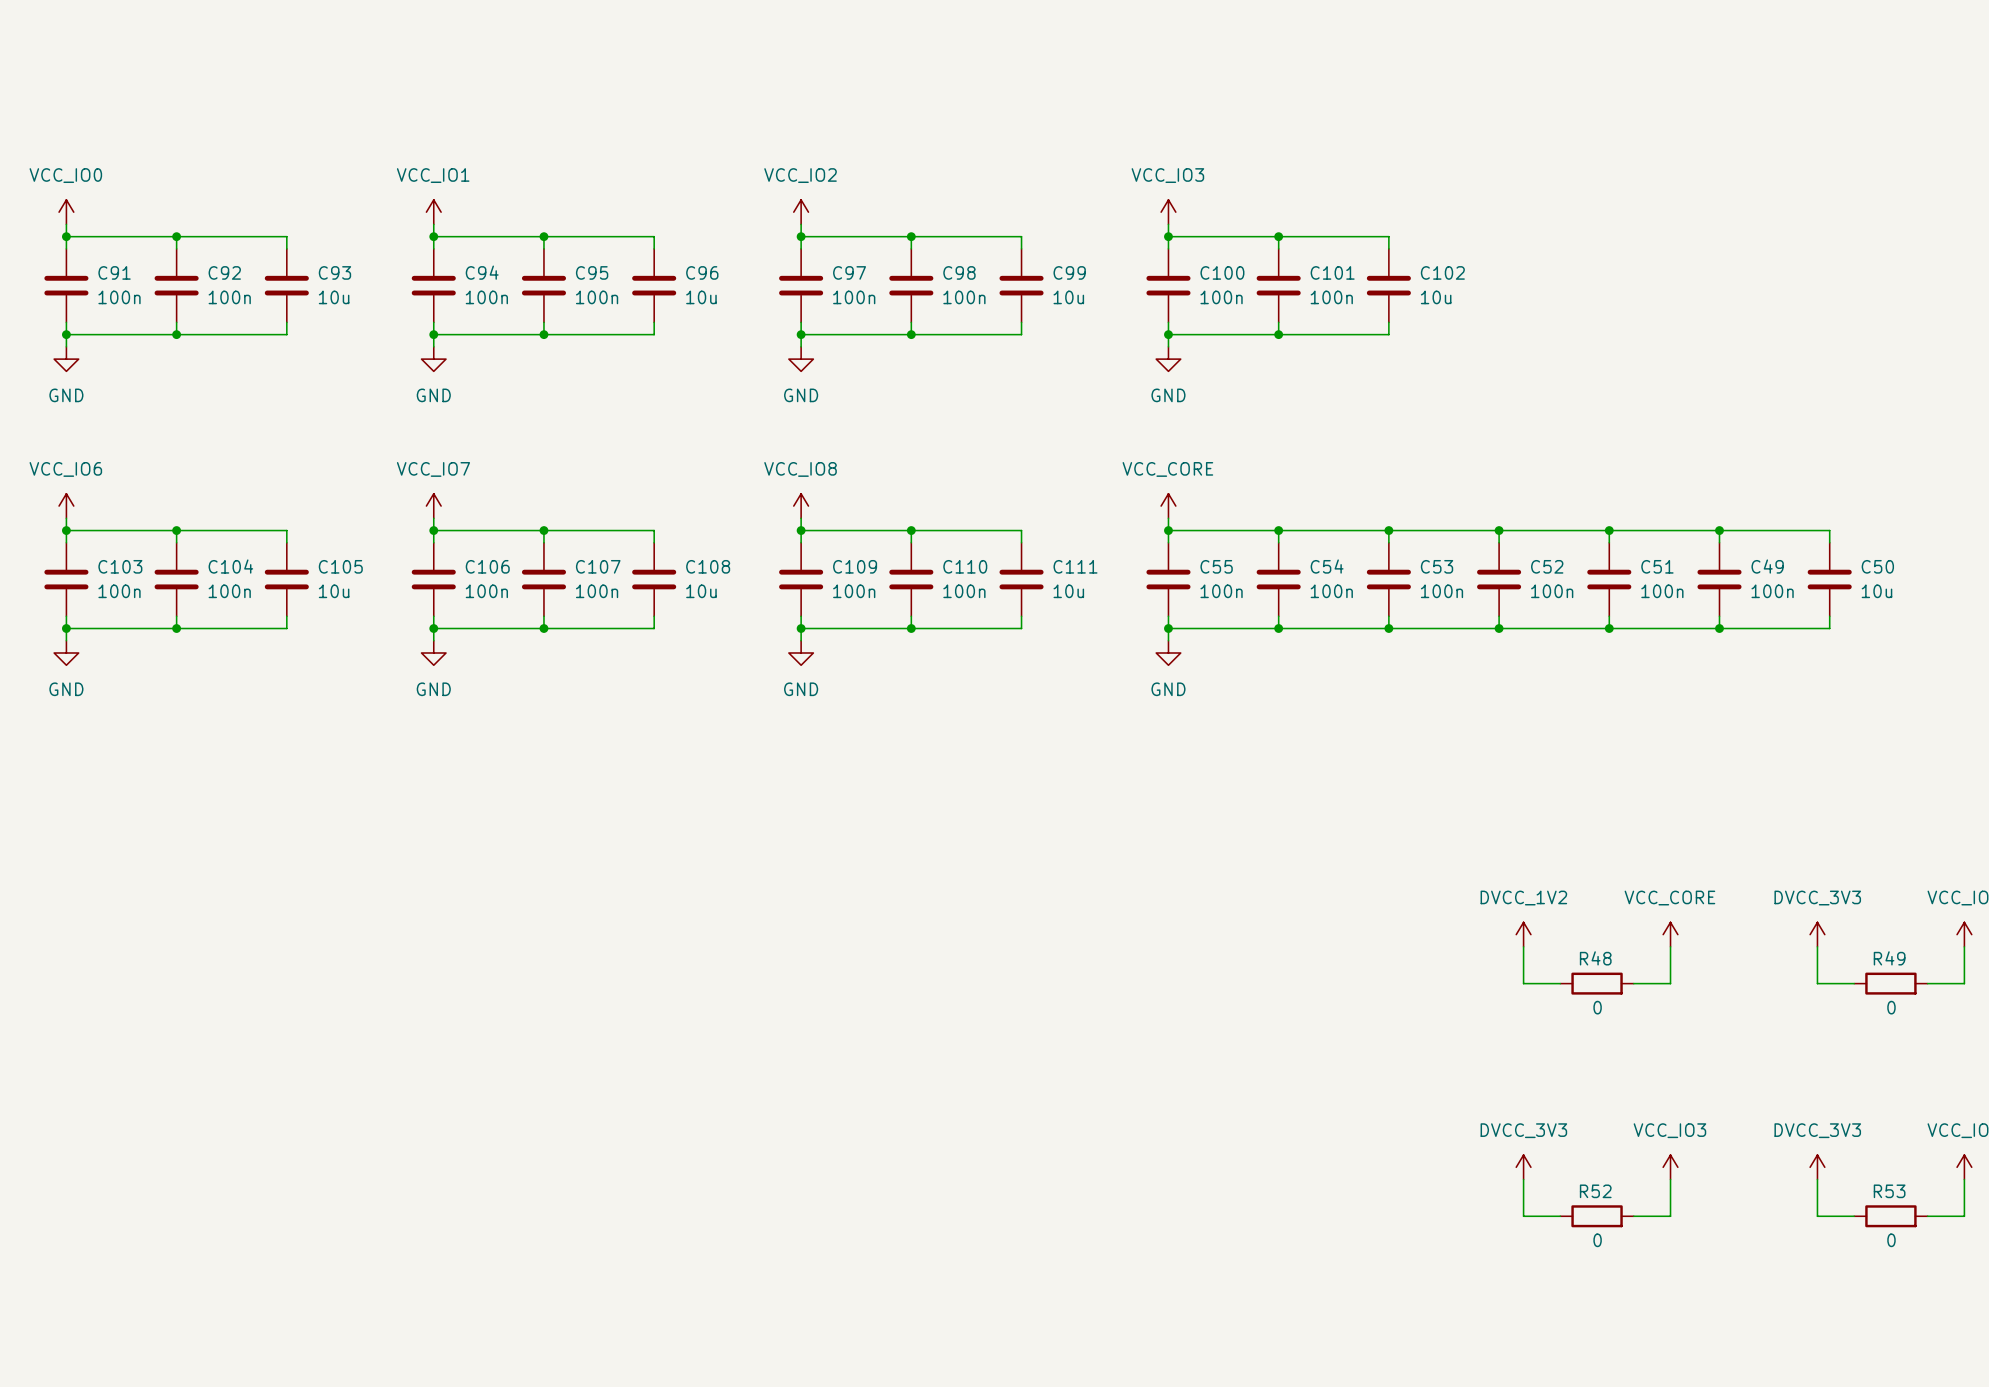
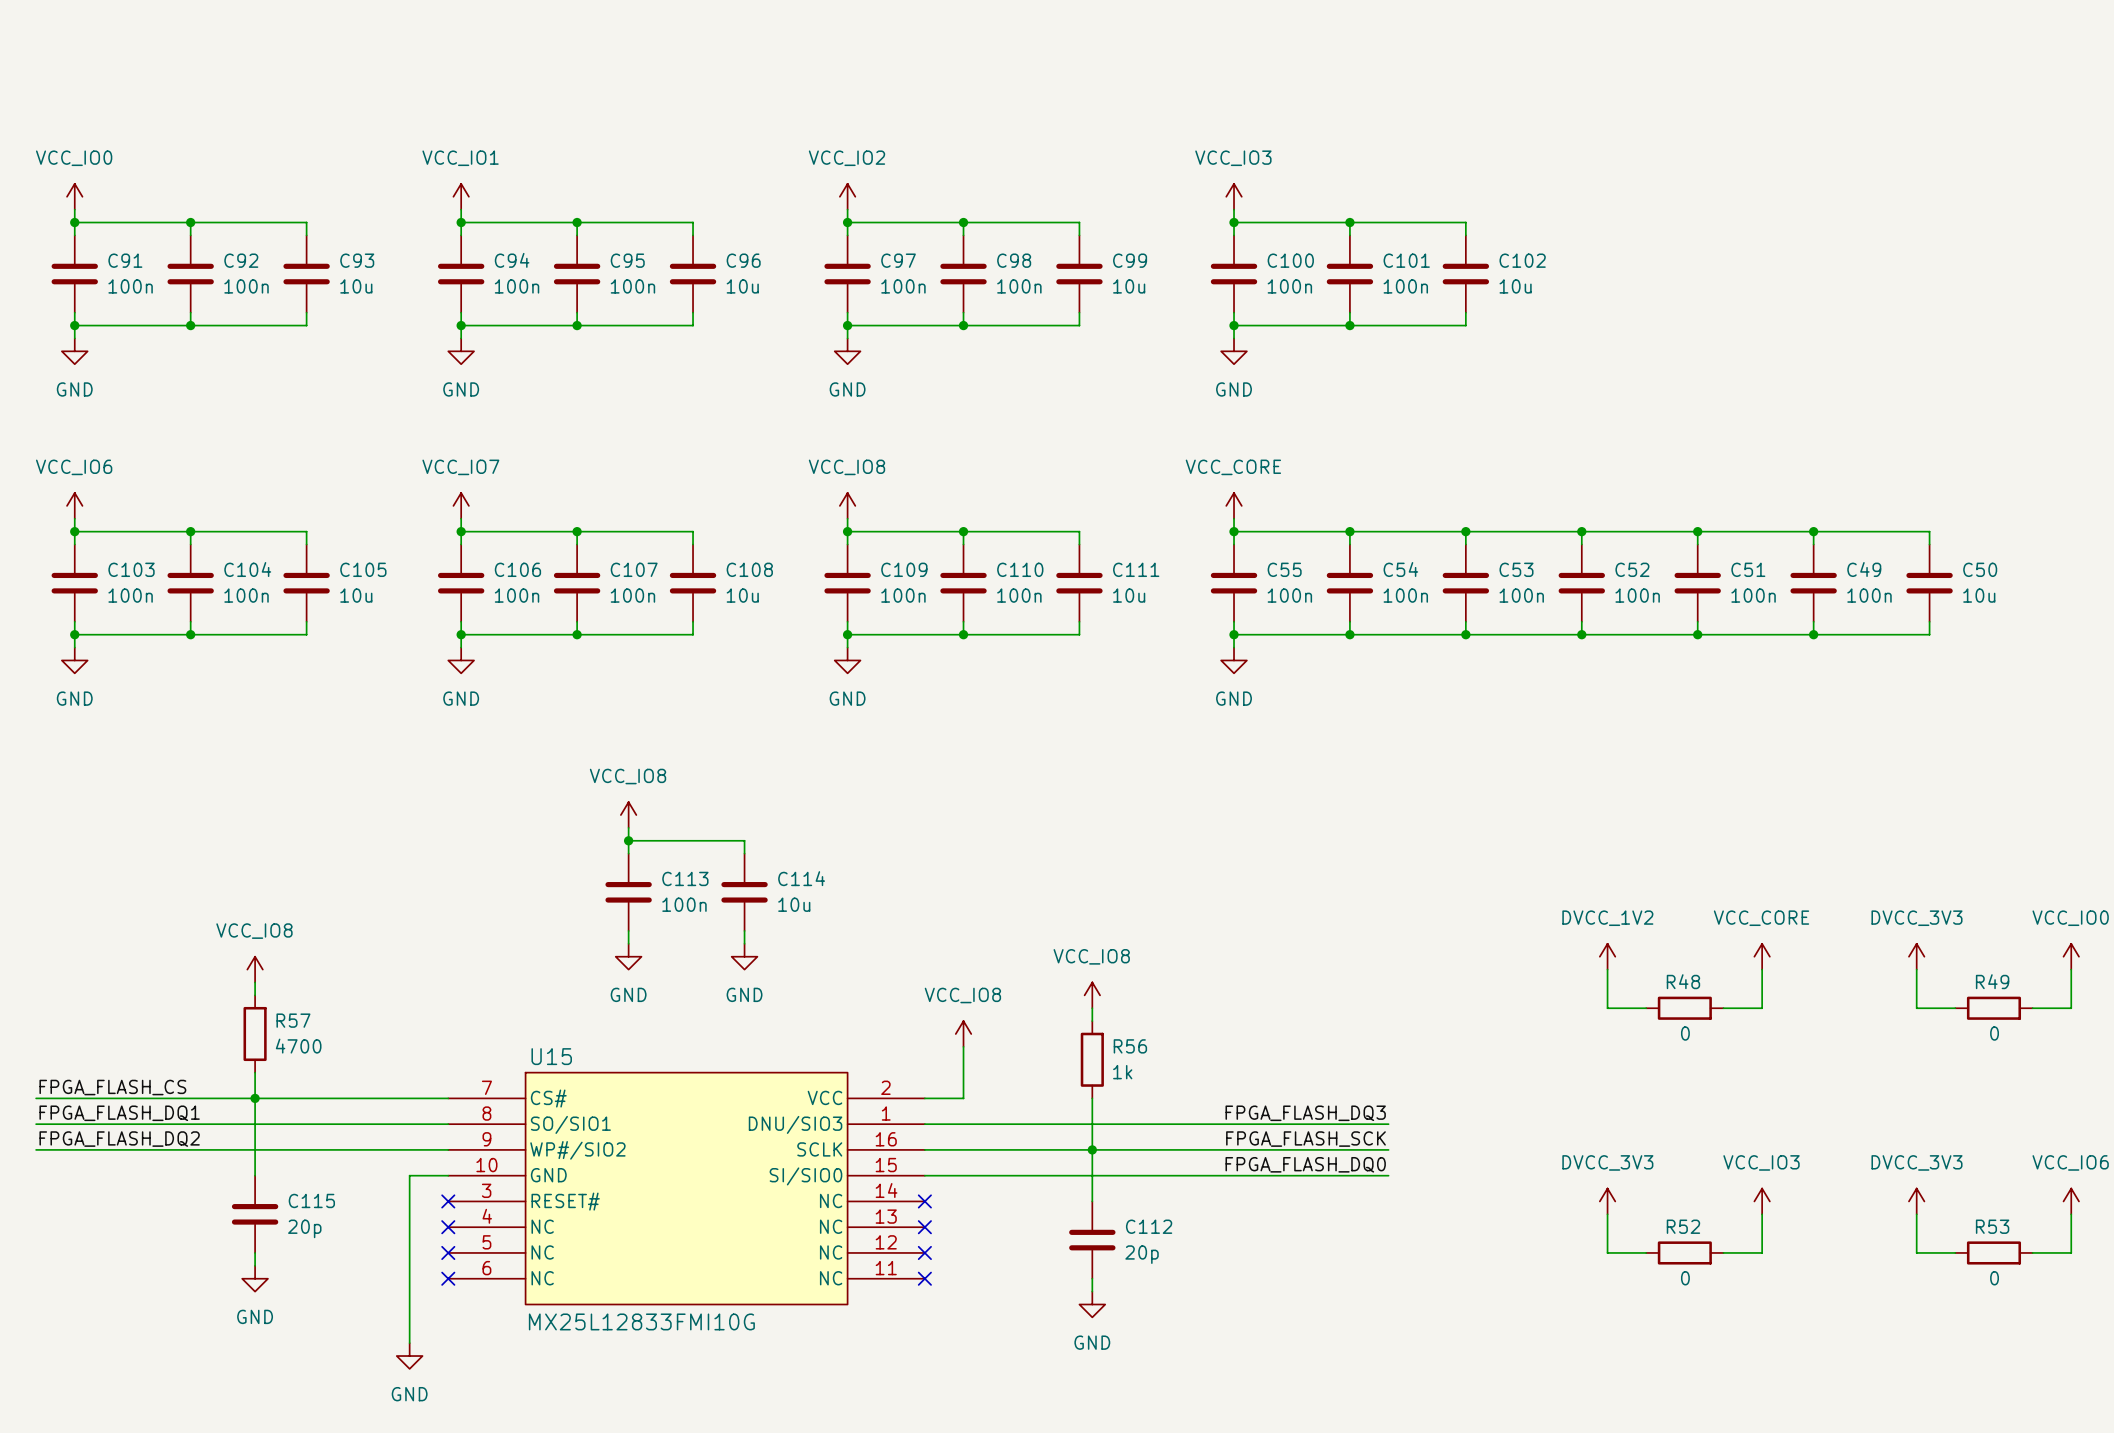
power symbol: none -> VCC_IO8 (628, 815)
wire: none -> (628, 827) (628, 853)
wire: none -> (628, 840) (744, 840) (744, 853)
junction: none -> (628, 840)
C113: none -> 100n (628, 892)
C114: none -> 10u (744, 892)
wire: none -> (628, 930) (628, 943)
wire: none -> (744, 930) (744, 943)
power symbol: none -> GND (628, 956)
power symbol: none -> GND (744, 956)
power symbol: none -> VCC_IO8 (255, 969)
wire: none -> (255, 982) (255, 995)
power symbol: none -> VCC_IO8 (1092, 995)
wire: none -> (1092, 1008) (1092, 1021)
R57: none -> 4700 (255, 1034)
power symbol: none -> VCC_IO8 (963, 1034)
wire: none -> (963, 1046) (963, 1098) (924, 1098)
R56: none -> 1k (1092, 1059)
wire: none -> (255, 1072) (255, 1175)
label: none -> FPGA_FLASH_CS (112, 1087)
wire: none -> (36, 1098) (448, 1098)
junction: none -> (255, 1098)
wire: none -> (1092, 1098) (1092, 1201)
label: none -> FPGA_FLASH_DQ1 (119, 1113)
label: none -> FPGA_FLASH_DQ3 (1305, 1113)
wire: none -> (36, 1124) (448, 1124)
wire: none -> (924, 1124) (1388, 1124)
label: none -> FPGA_FLASH_DQ2 (119, 1139)
label: none -> FPGA_FLASH_SCK (1305, 1139)
wire: none -> (36, 1149) (448, 1149)
wire: none -> (924, 1149) (1388, 1149)
junction: none -> (1092, 1149)
label: none -> FPGA_FLASH_DQ0 (1305, 1164)
wire: none -> (448, 1175) (409, 1175) (409, 1343)
wire: none -> (924, 1175) (1388, 1175)
U15: none -> MX25L12833FMI10G (686, 1188)
no-connect mark: none -> (448, 1201)
no-connect mark: none -> (924, 1201)
C115: none -> 20p (255, 1214)
no-connect mark: none -> (448, 1227)
no-connect mark: none -> (924, 1227)
C112: none -> 20p (1092, 1240)
wire: none -> (255, 1252) (255, 1265)
no-connect mark: none -> (448, 1252)
no-connect mark: none -> (924, 1252)
power symbol: none -> GND (255, 1278)
no-connect mark: none -> (448, 1278)
no-connect mark: none -> (924, 1278)
wire: none -> (1092, 1278) (1092, 1291)
power symbol: none -> GND (1092, 1304)
power symbol: none -> GND (409, 1356)

